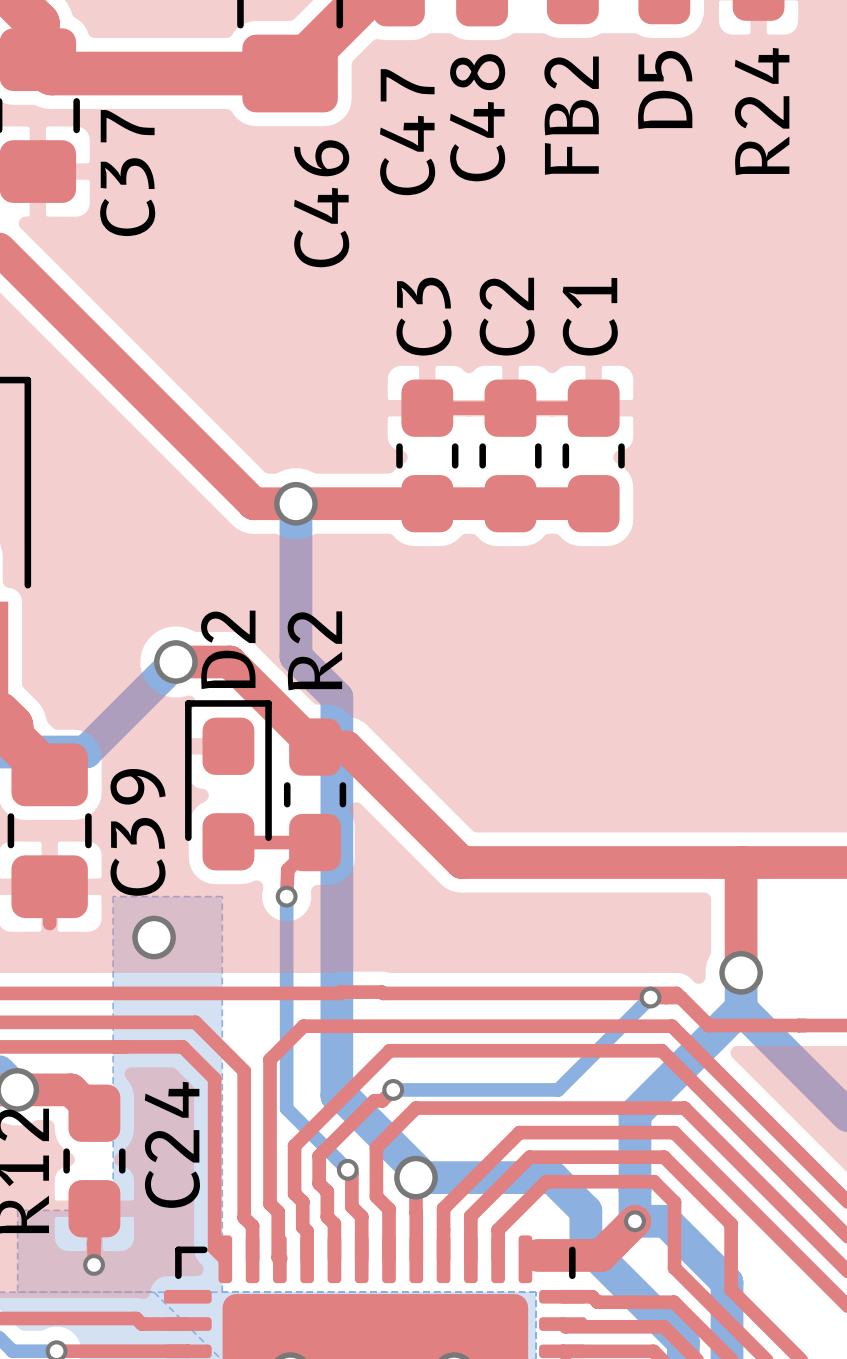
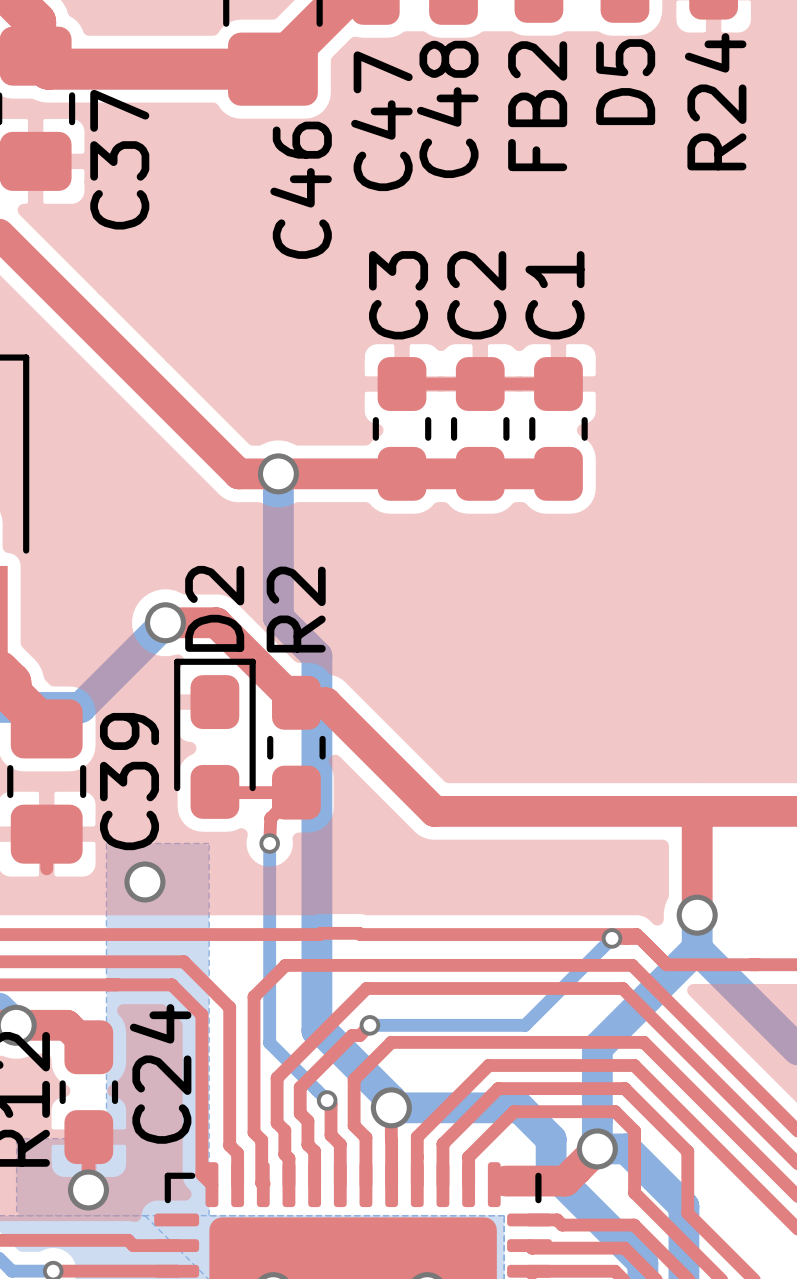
via size: [624, 1210, 646, 1233] -> [576, 1128, 618, 1170]
via size: [83, 1254, 105, 1276] -> [67, 1169, 110, 1211]

